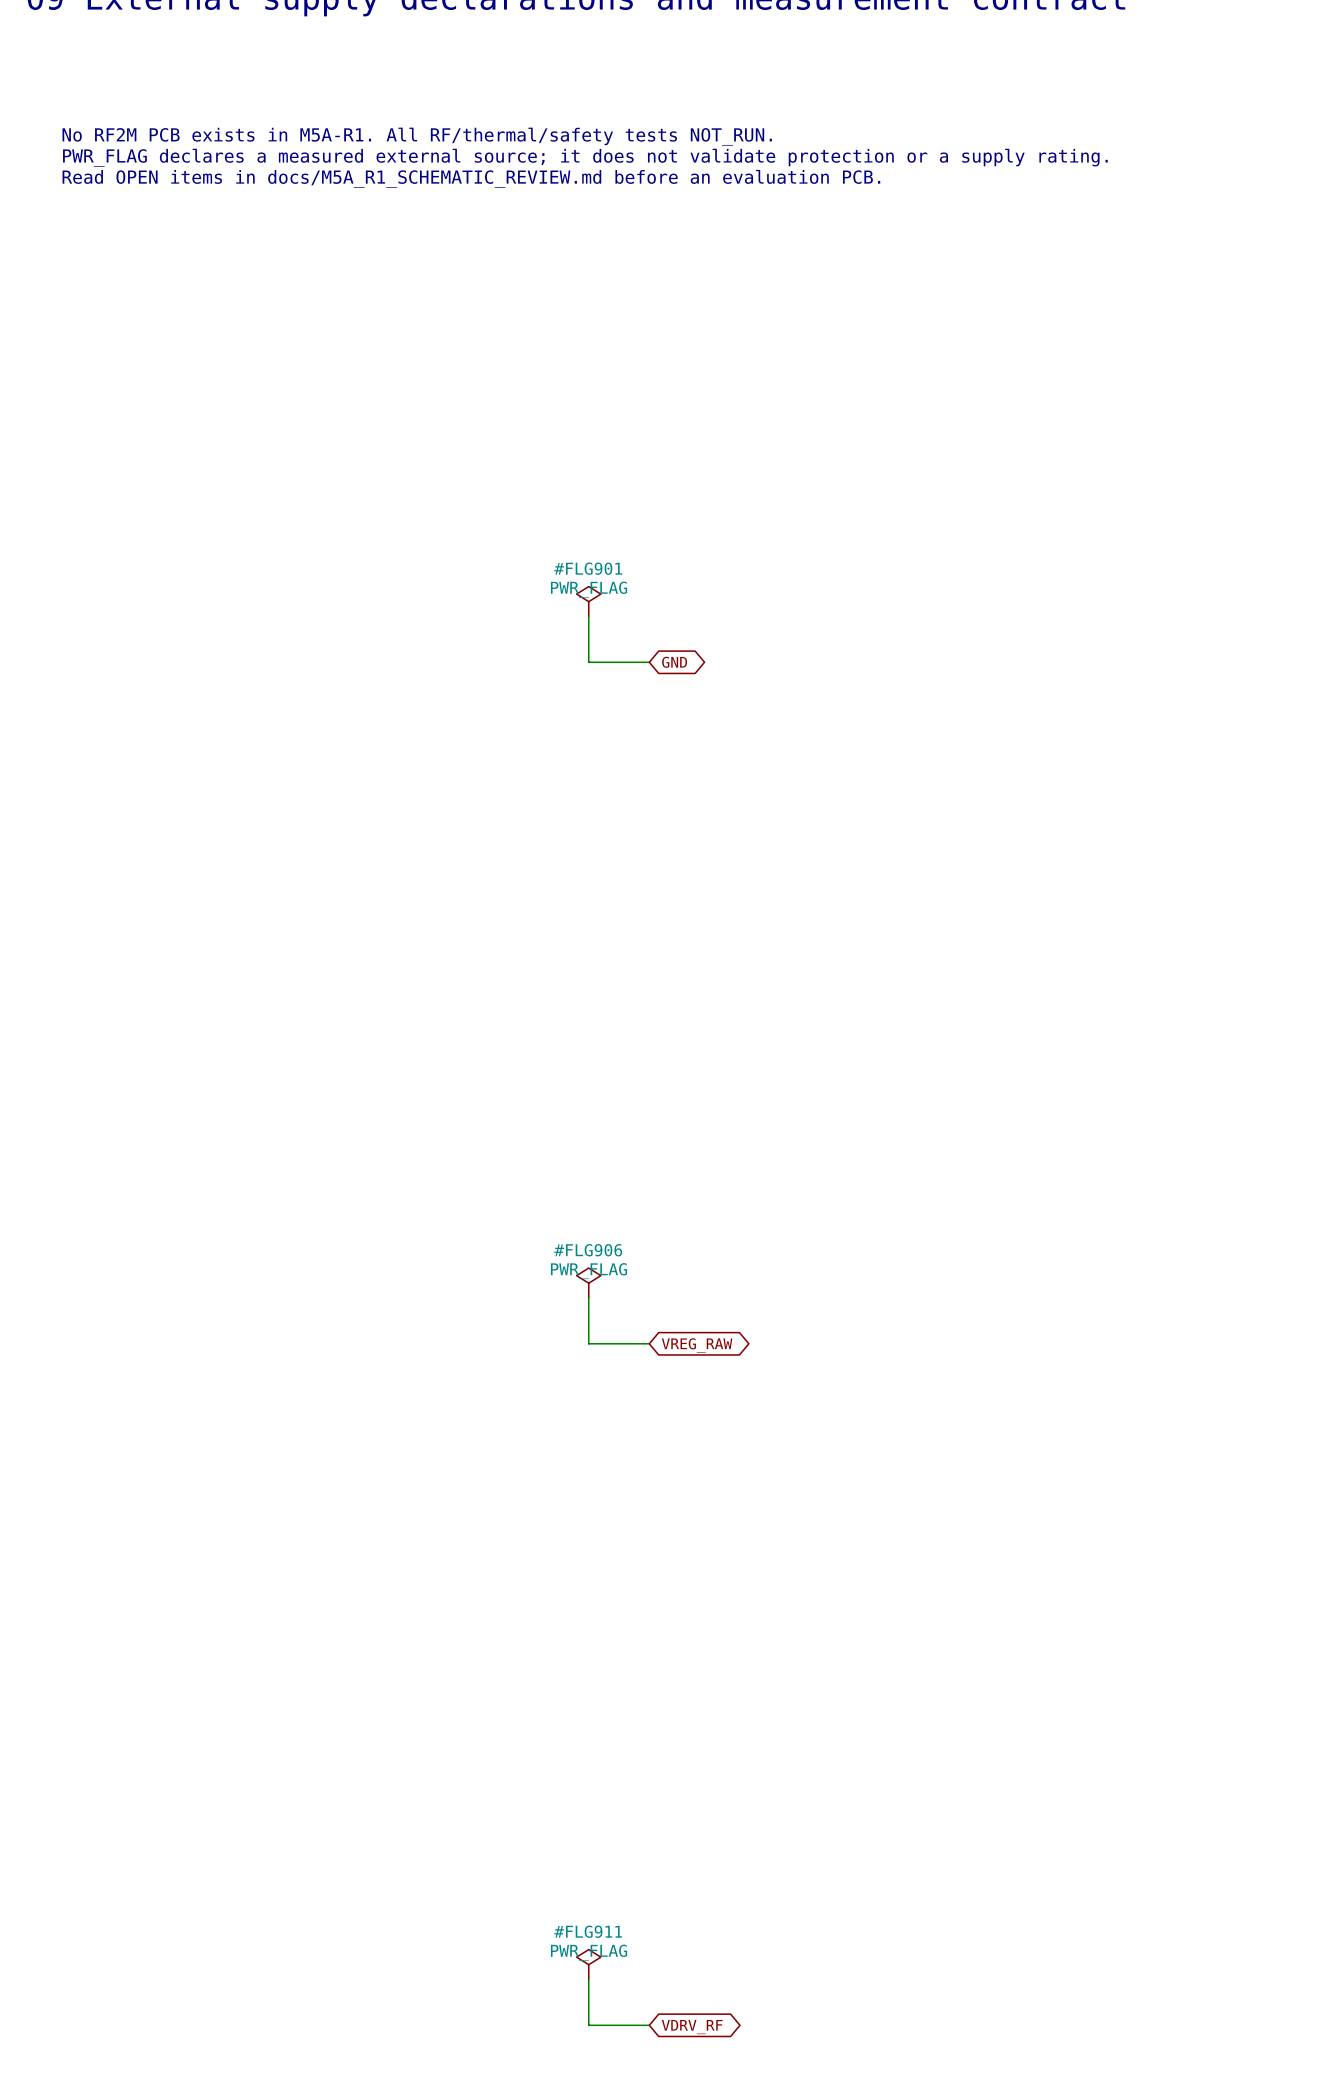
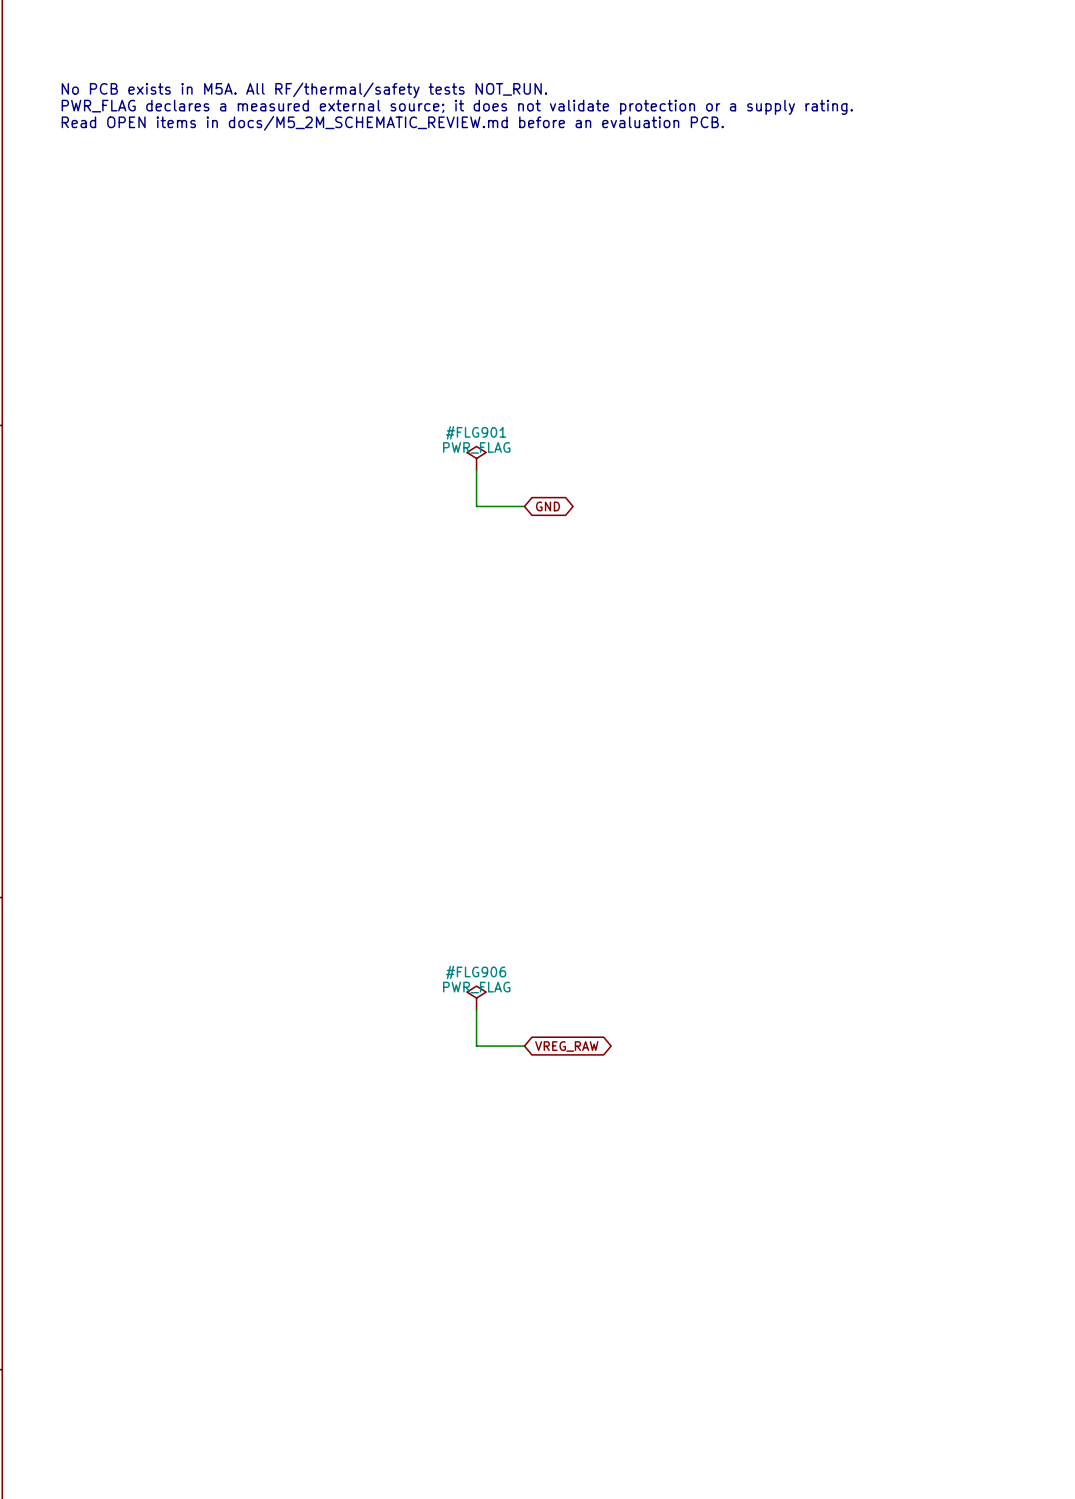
text: No RF2M PCB exists in M5A-R1. All RF/thermal/safety tests NOT_RUN. (417, 136) -> No PCB exists in M5A. All RF/thermal/safety tests NOT_RUN. (304, 90)
text: Read OPEN items in docs/M5A_R1_SCHEMATIC_REVIEW.md before an evaluation PCB. (471, 178) -> Read OPEN items in docs/M5_2M_SCHEMATIC_REVIEW.md before an evaluation PCB. (392, 123)

